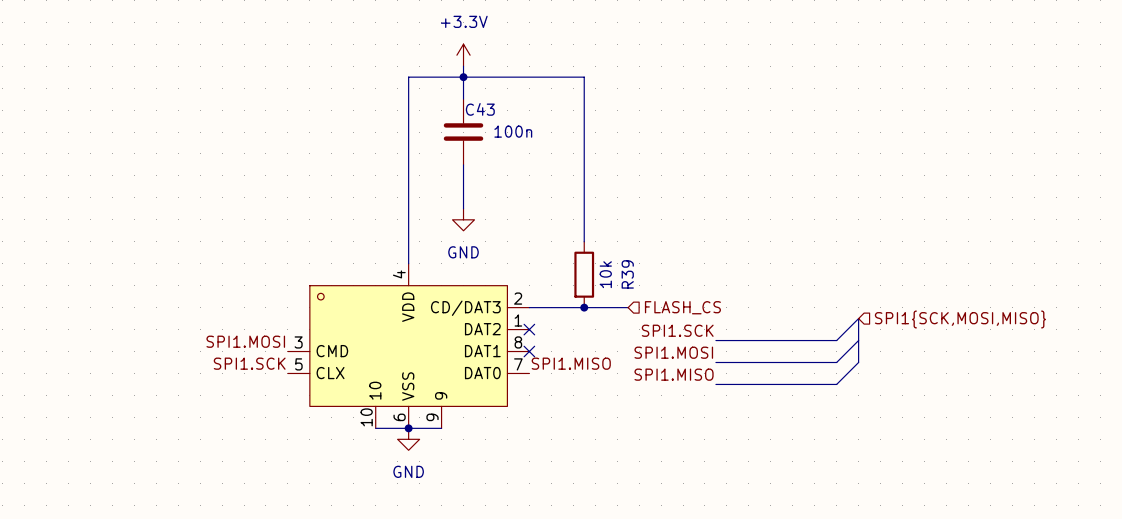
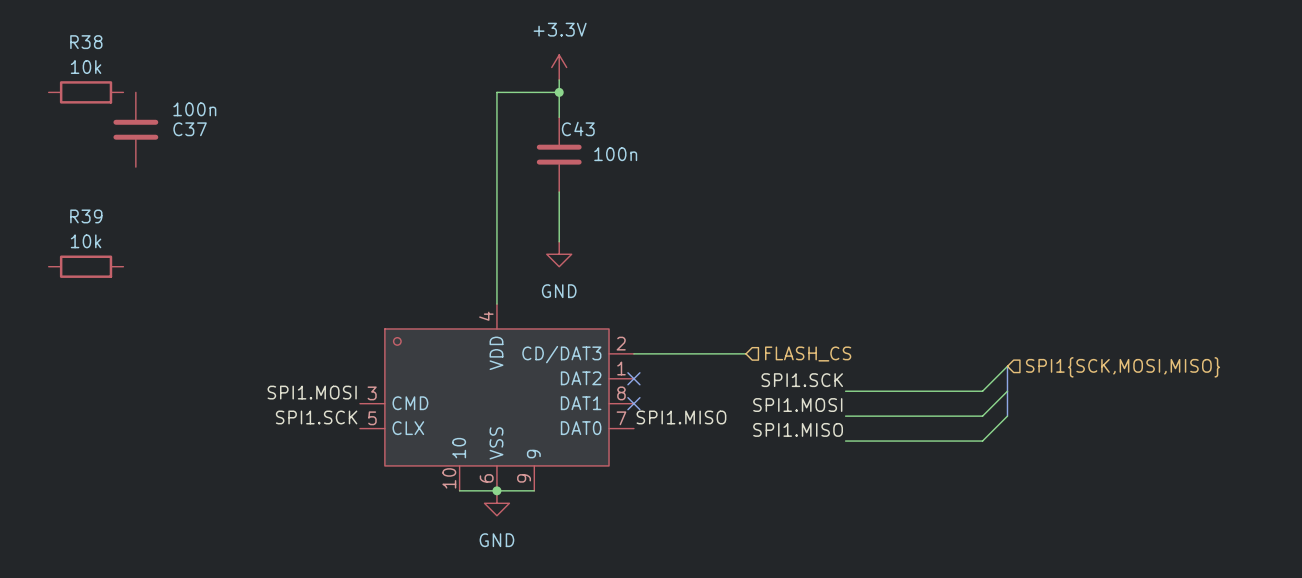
R38: none -> 10k (86, 92)
wire: (463, 77) (584, 77) (584, 241) -> none
C37: none -> 100n (135, 129)
R39 rotation: 0° (584, 274) -> 90° clockwise (86, 266)
R39 position: (584, 274) -> (86, 266)
R39 value position: 10k (605, 274) -> 10k (86, 241)
R39 name position: R39 (627, 274) -> R39 (86, 216)
junction: (584, 307) -> none

